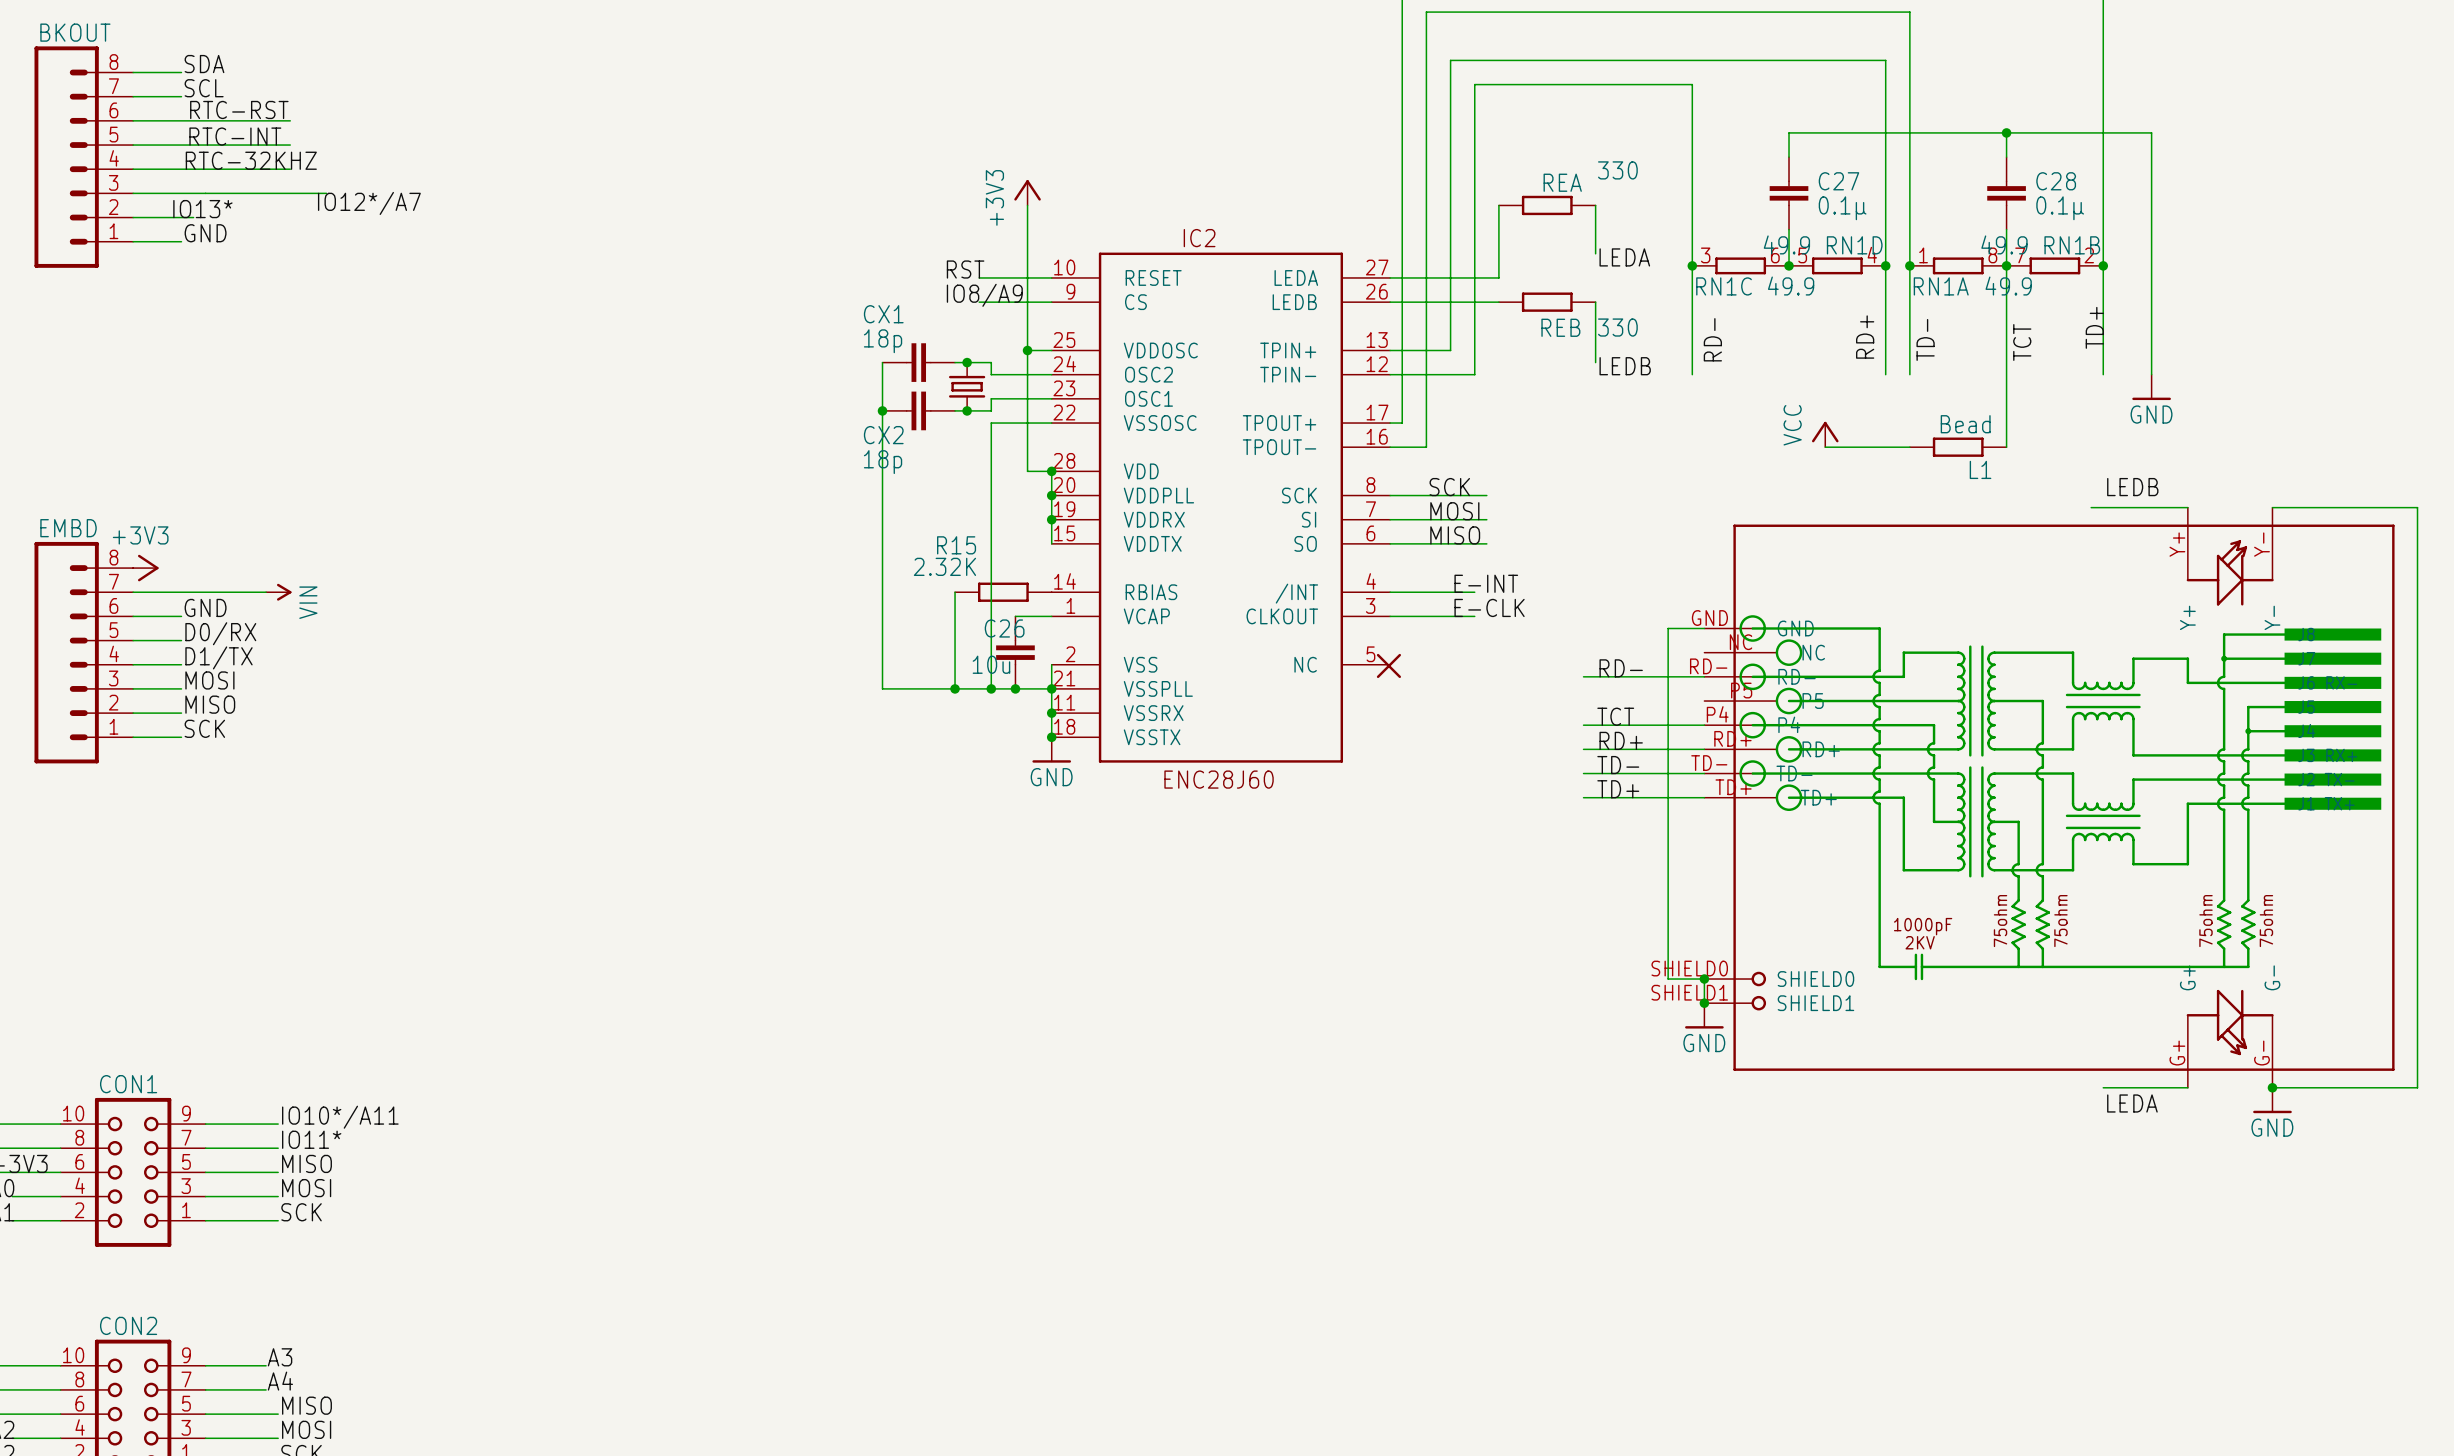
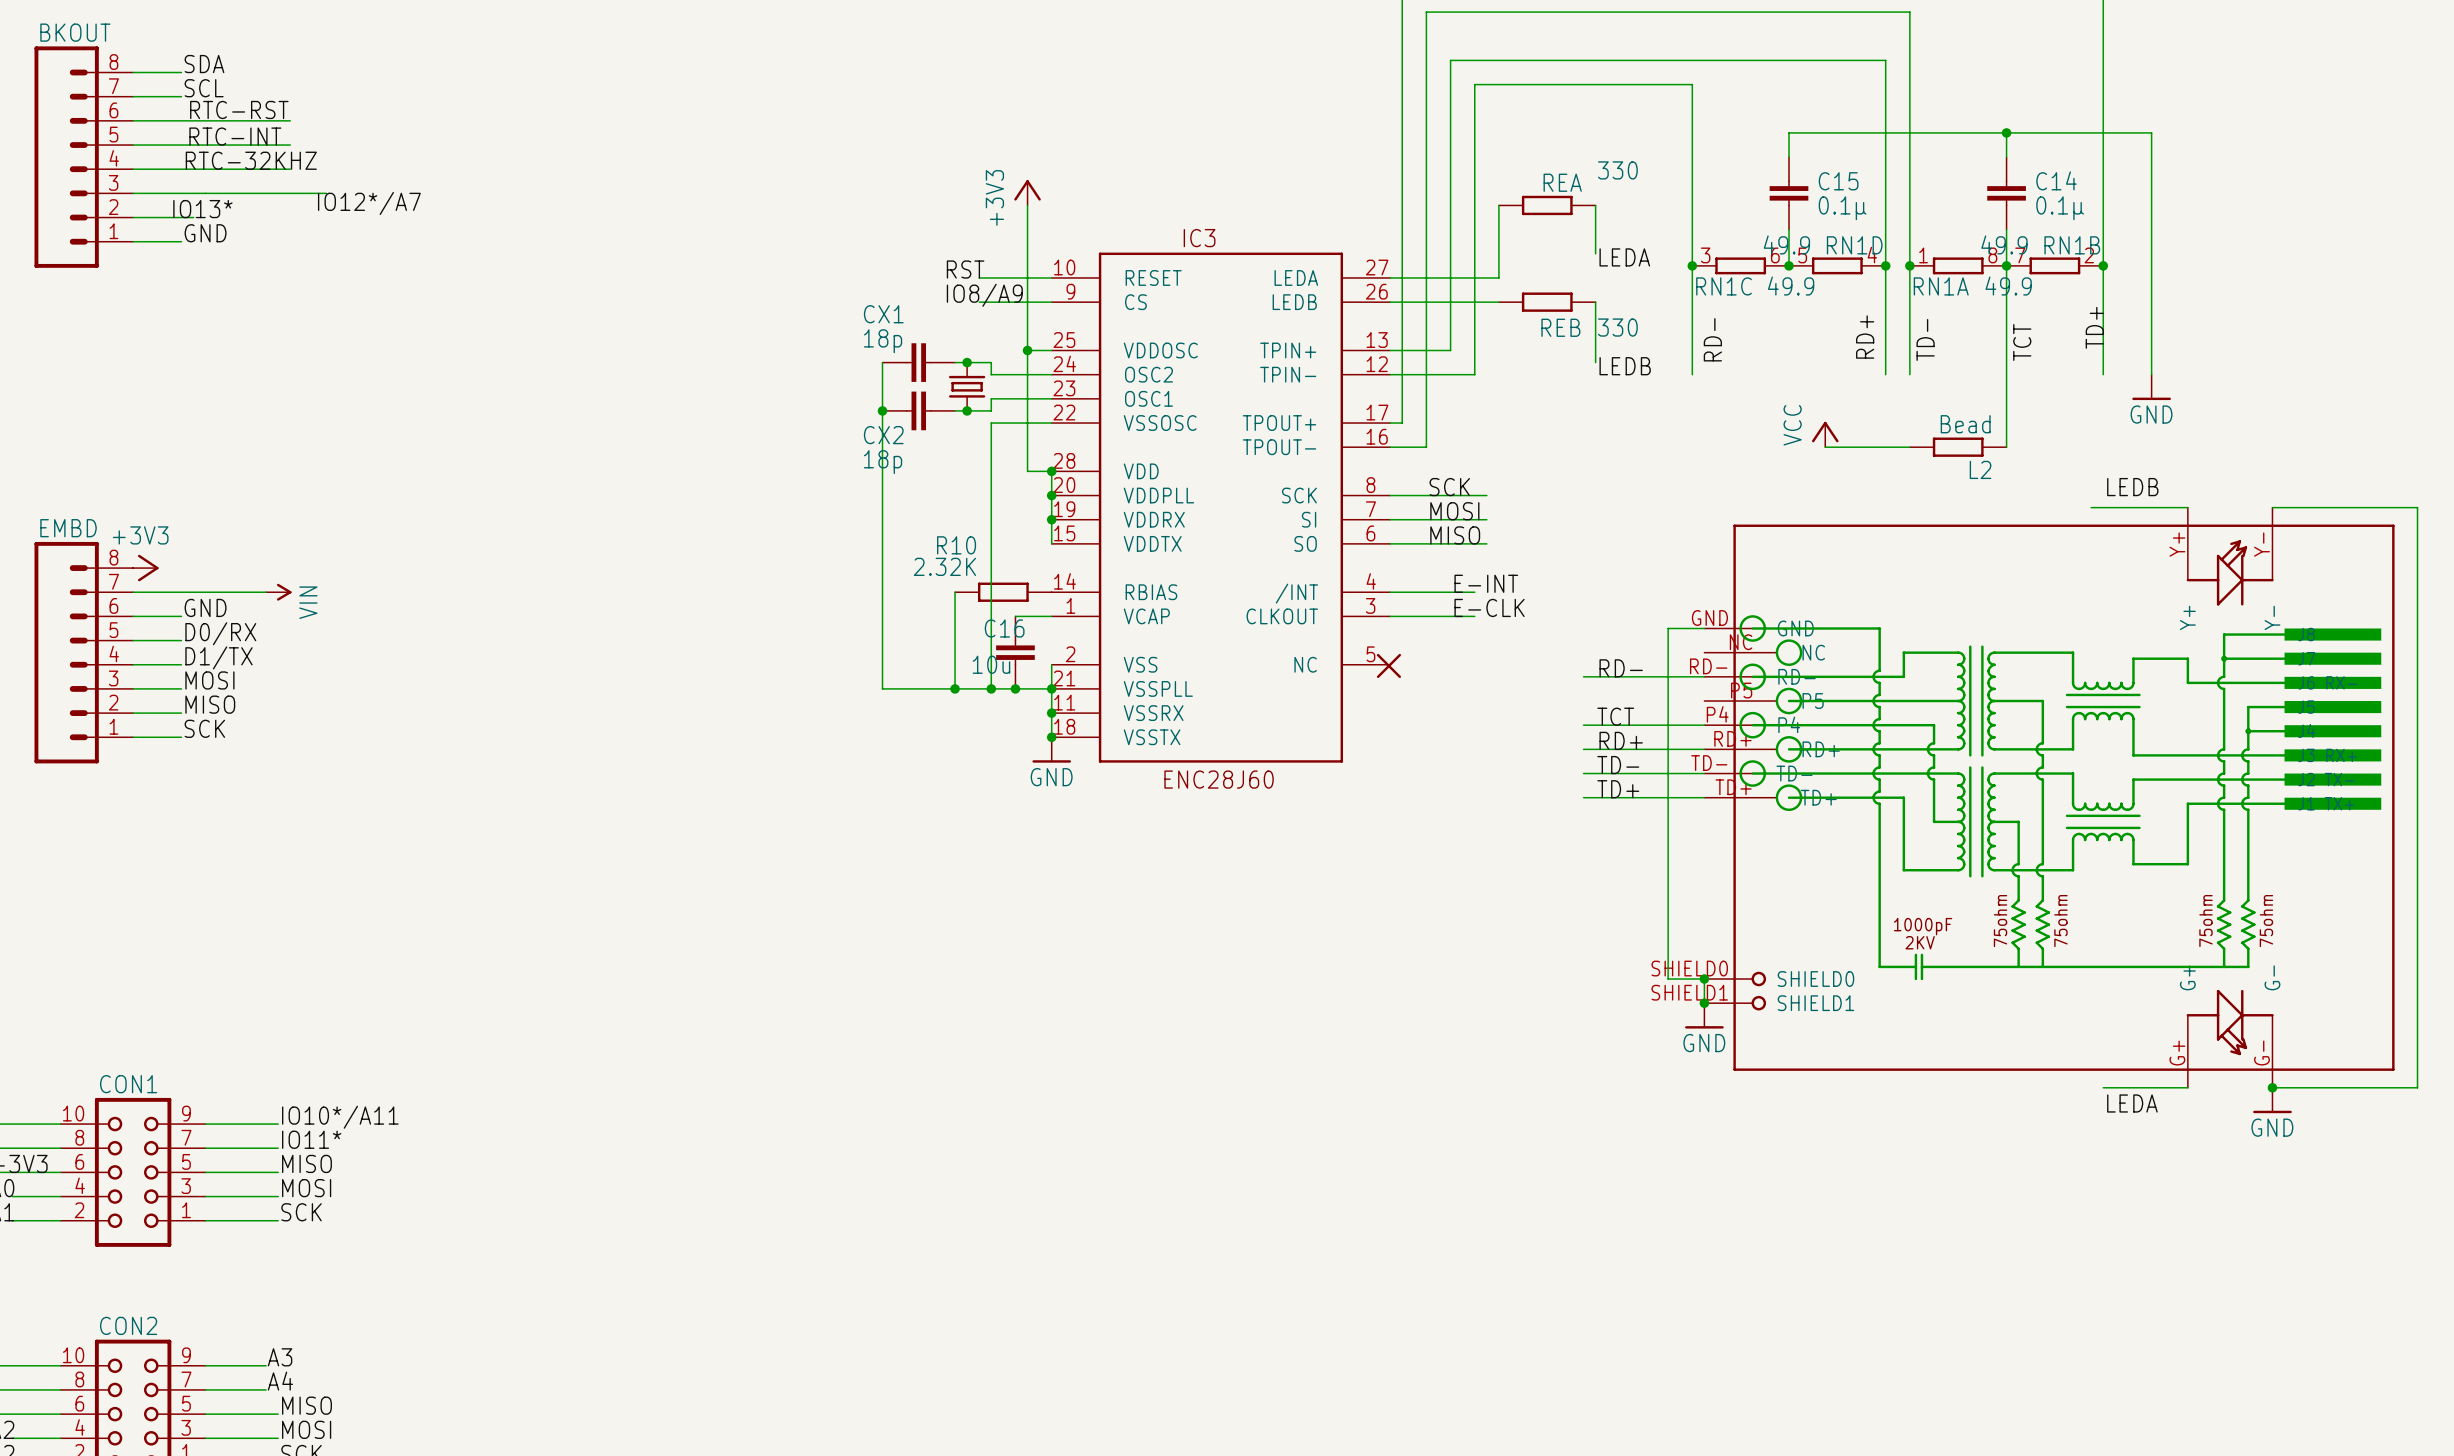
C27 name: C27 (1838, 181) -> C15 (1838, 181)
C28 name: C28 (2056, 181) -> C14 (2056, 180)
IC2 name: IC2 (1199, 238) -> IC3 (1199, 238)
L1 name: L1 (1980, 469) -> L2 (1980, 469)
R15 name: R15 (956, 545) -> R10 (956, 545)
C26 name: C26 (1004, 628) -> C16 (1004, 628)

